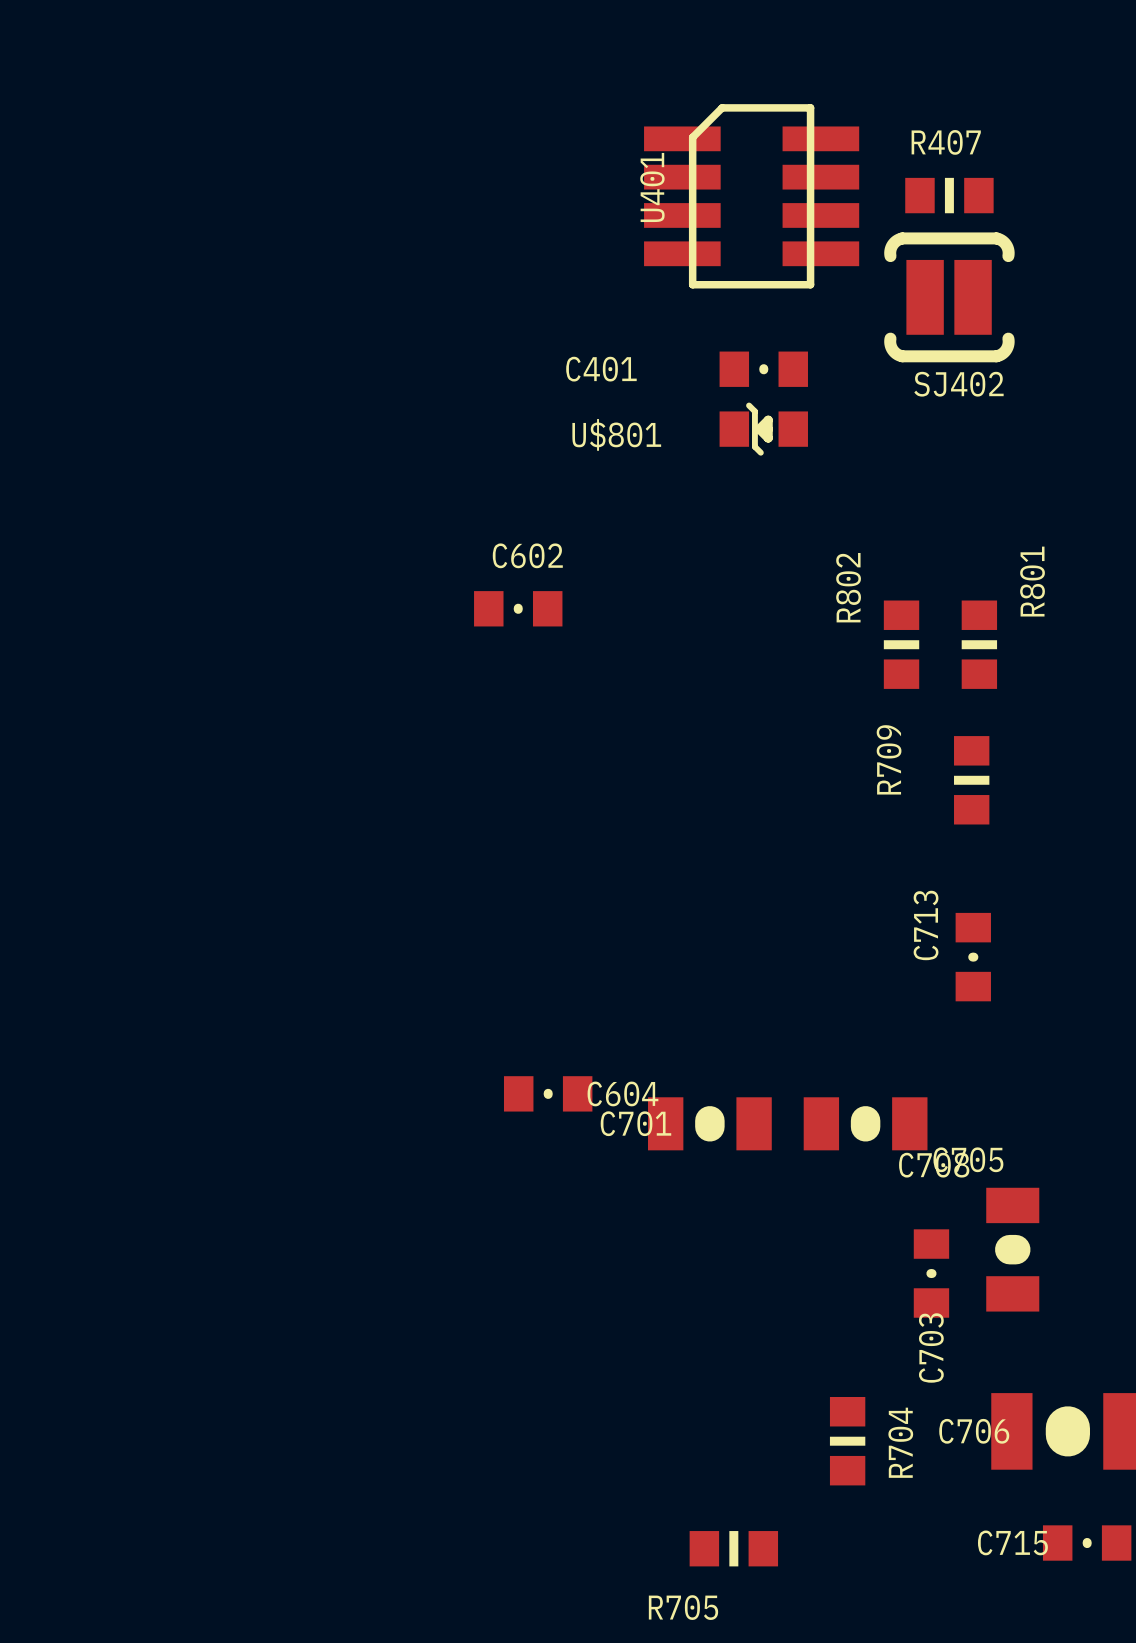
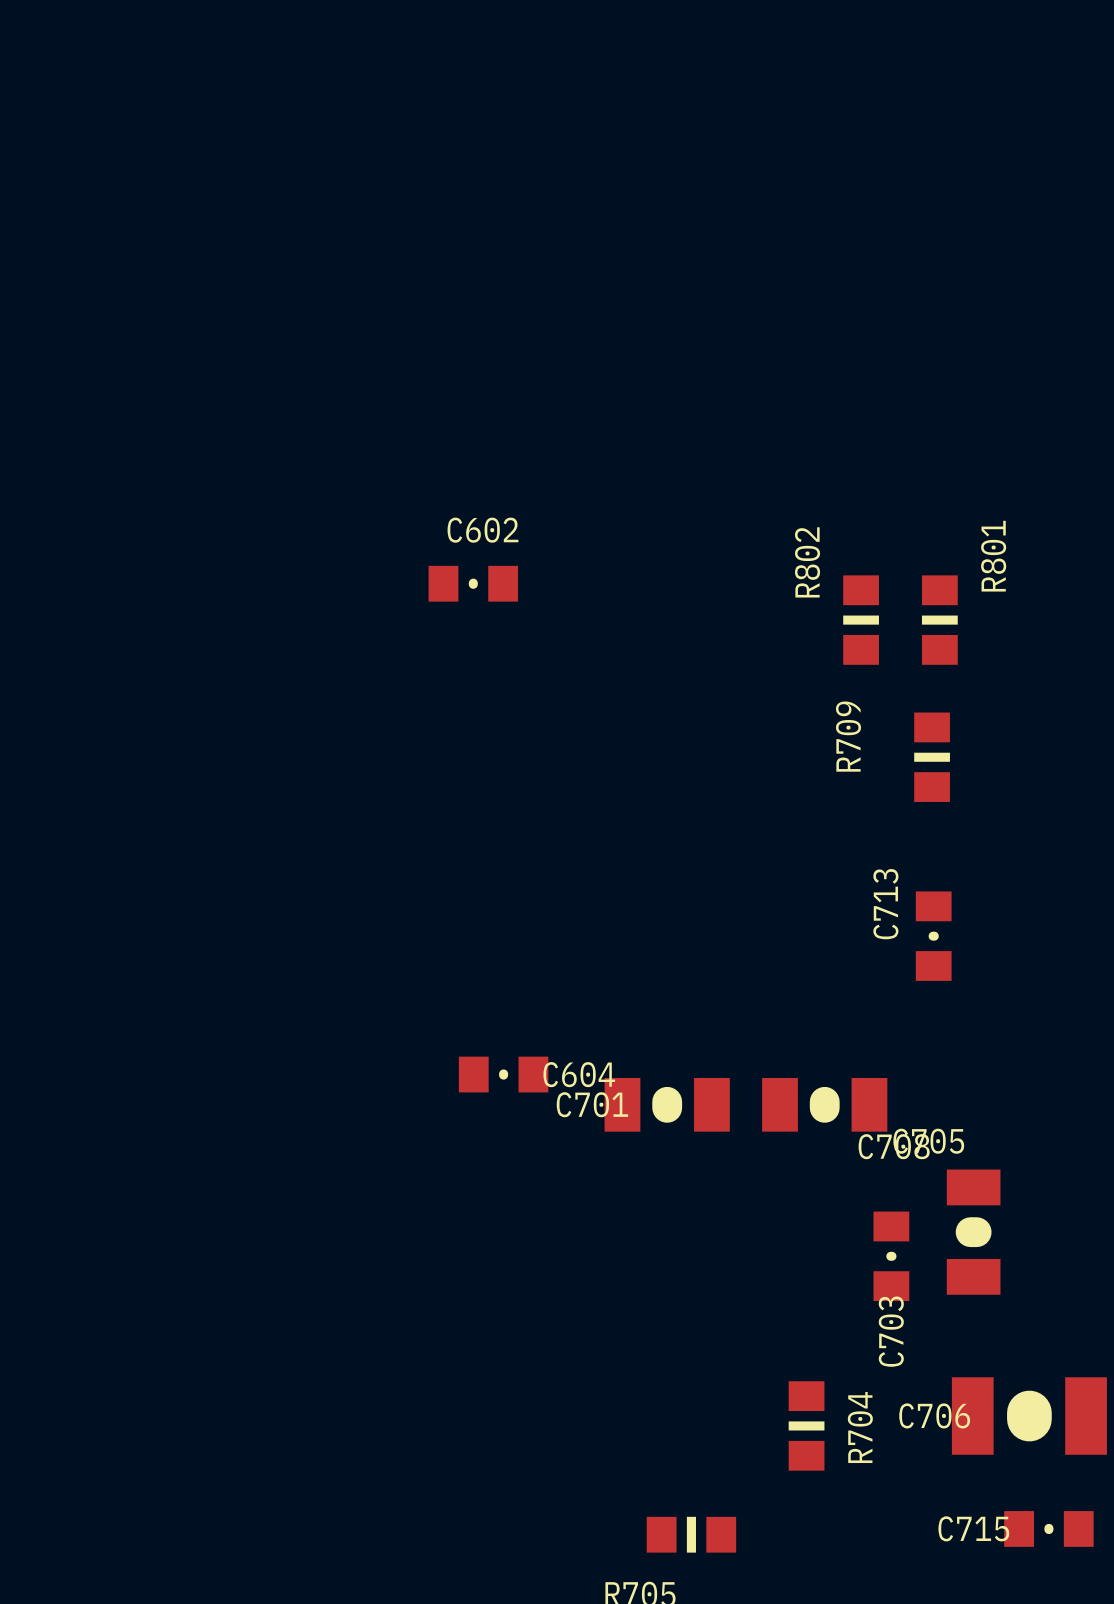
R407: (949, 195) -> none
U401: (751, 196) -> none
SJ402: (949, 297) -> none
C401: (763, 369) -> none
U$801: (763, 429) -> none

